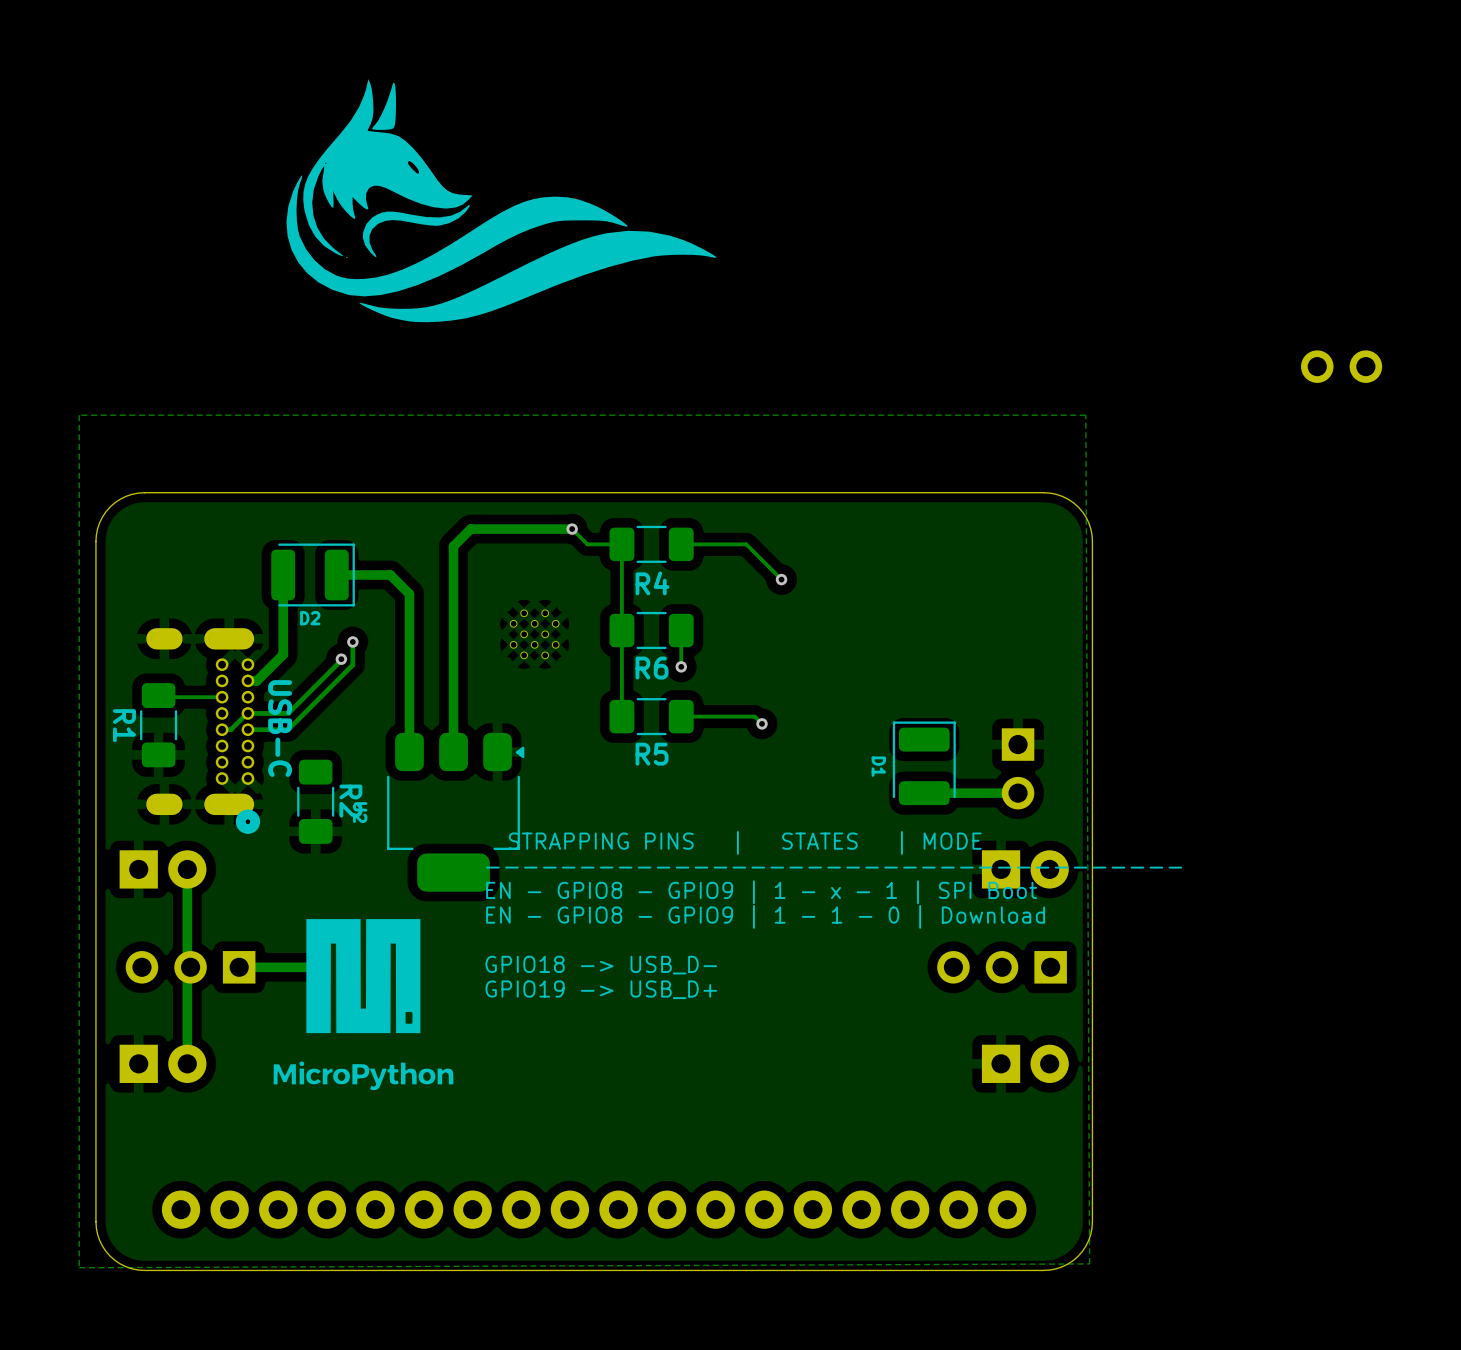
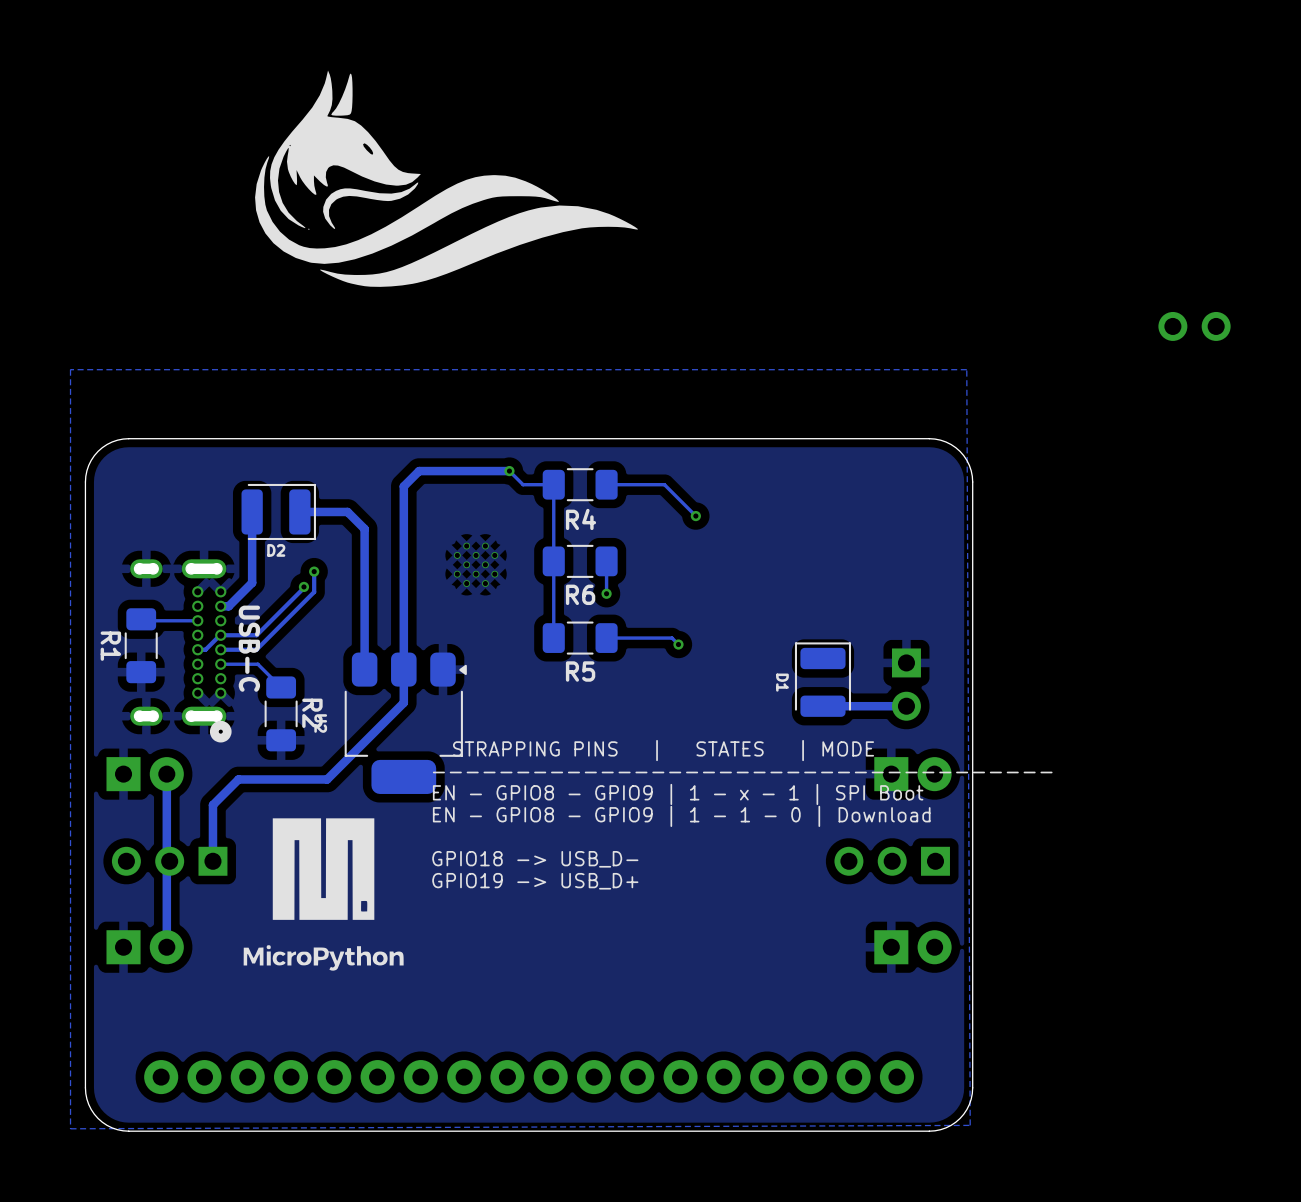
track: none -> (220, 664) (257, 664) (281, 687)
track: (308, 967) (239, 967) -> (403, 669) (403, 702) (327, 779) (238, 779) (212, 805) (212, 861)

